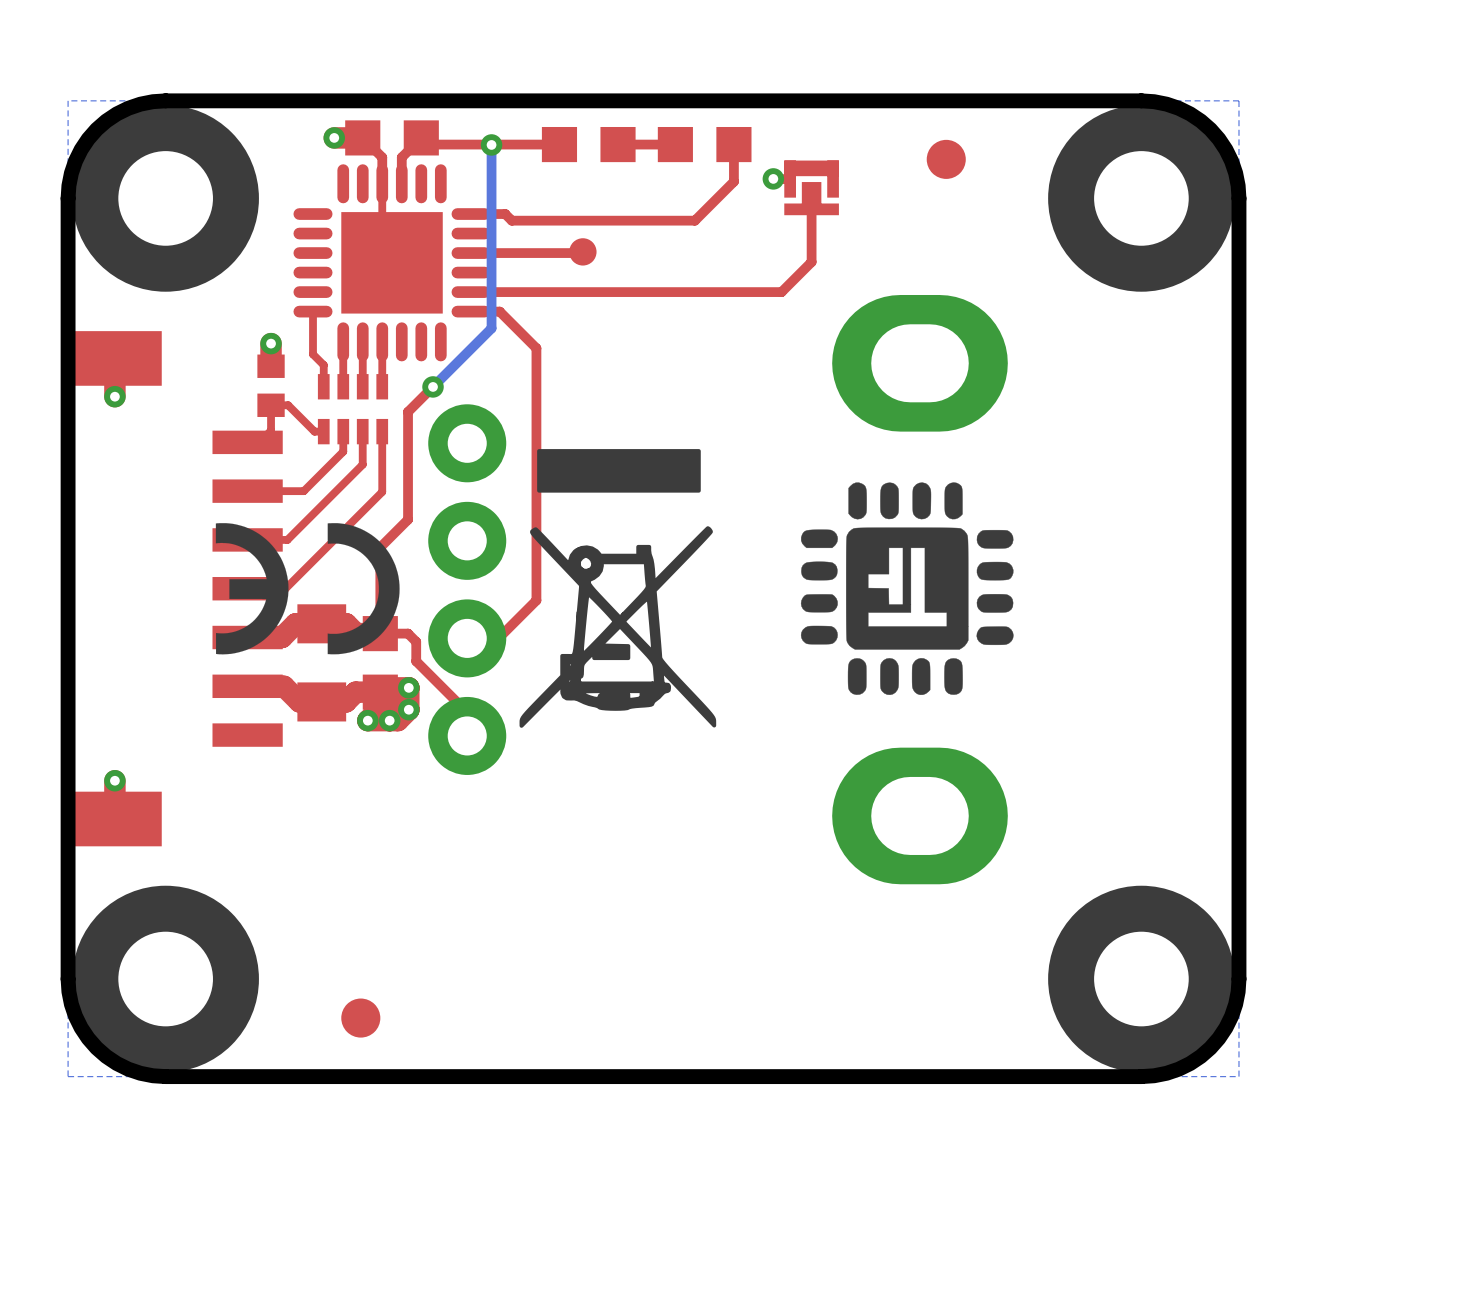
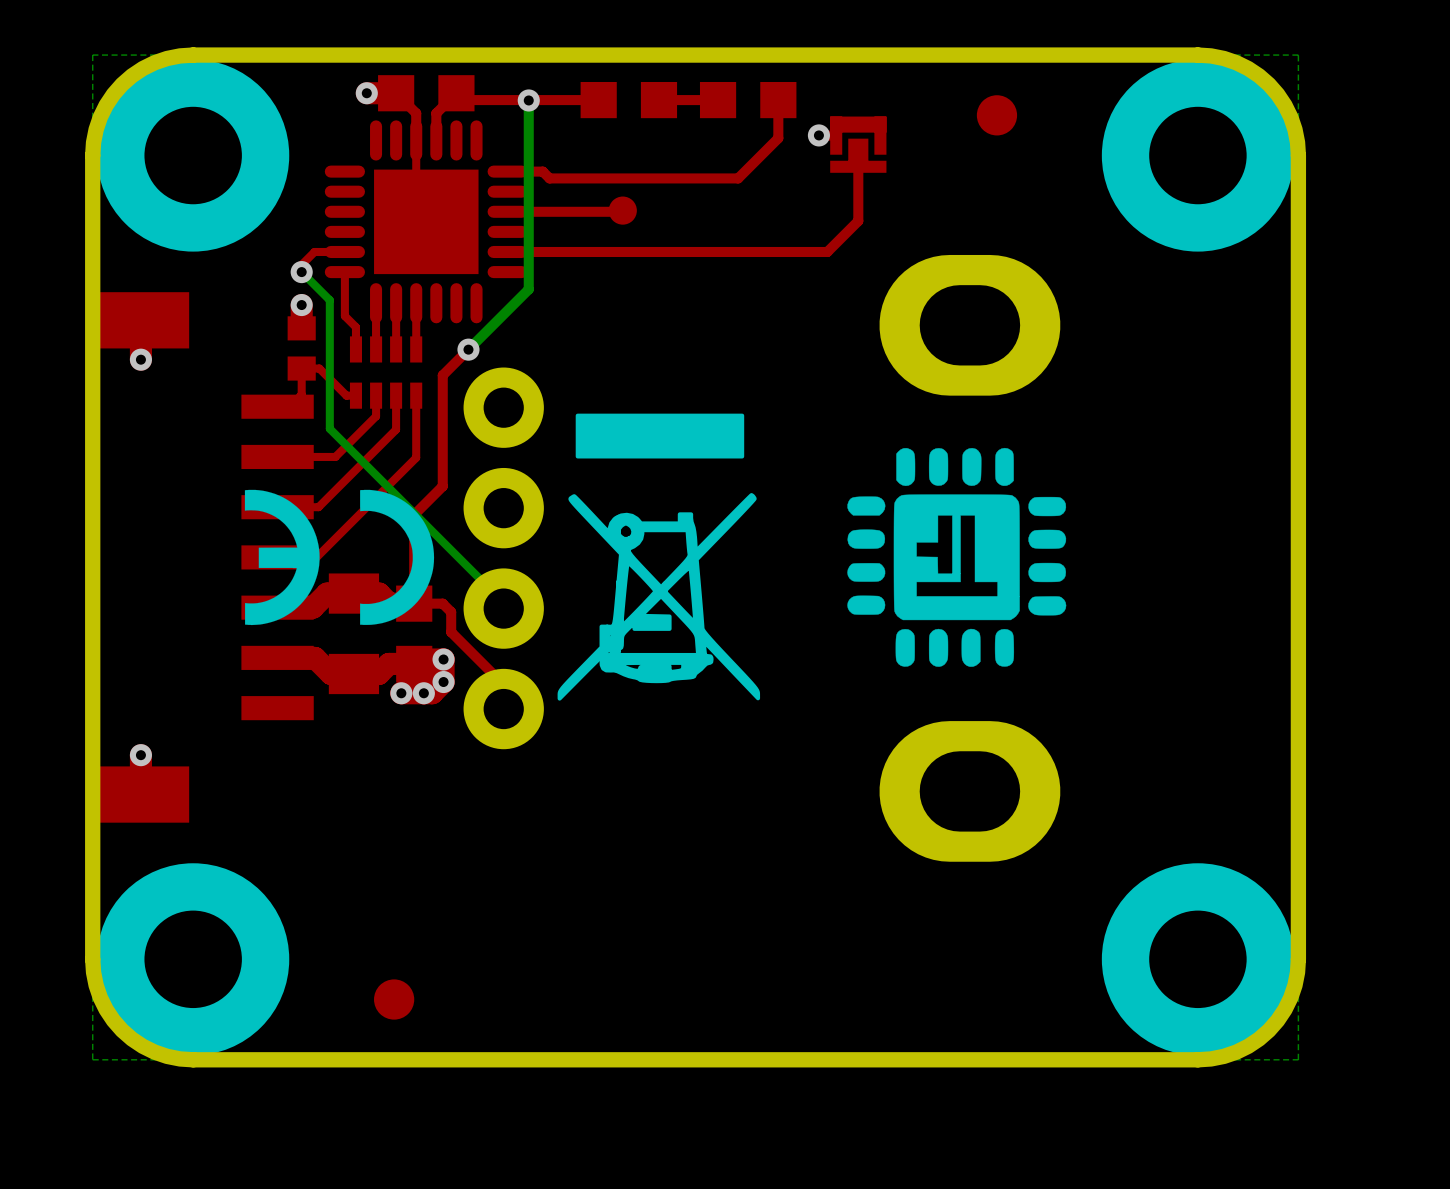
top track: none -> (344, 251) (314, 251) (301, 264) (301, 272)
bottom track: none -> (301, 272) (329, 300) (329, 428) (503, 602) (503, 608)
via: none -> (301, 272)
top track: (471, 311) (499, 311) (536, 348) (536, 600) (498, 638) (467, 638) -> none

